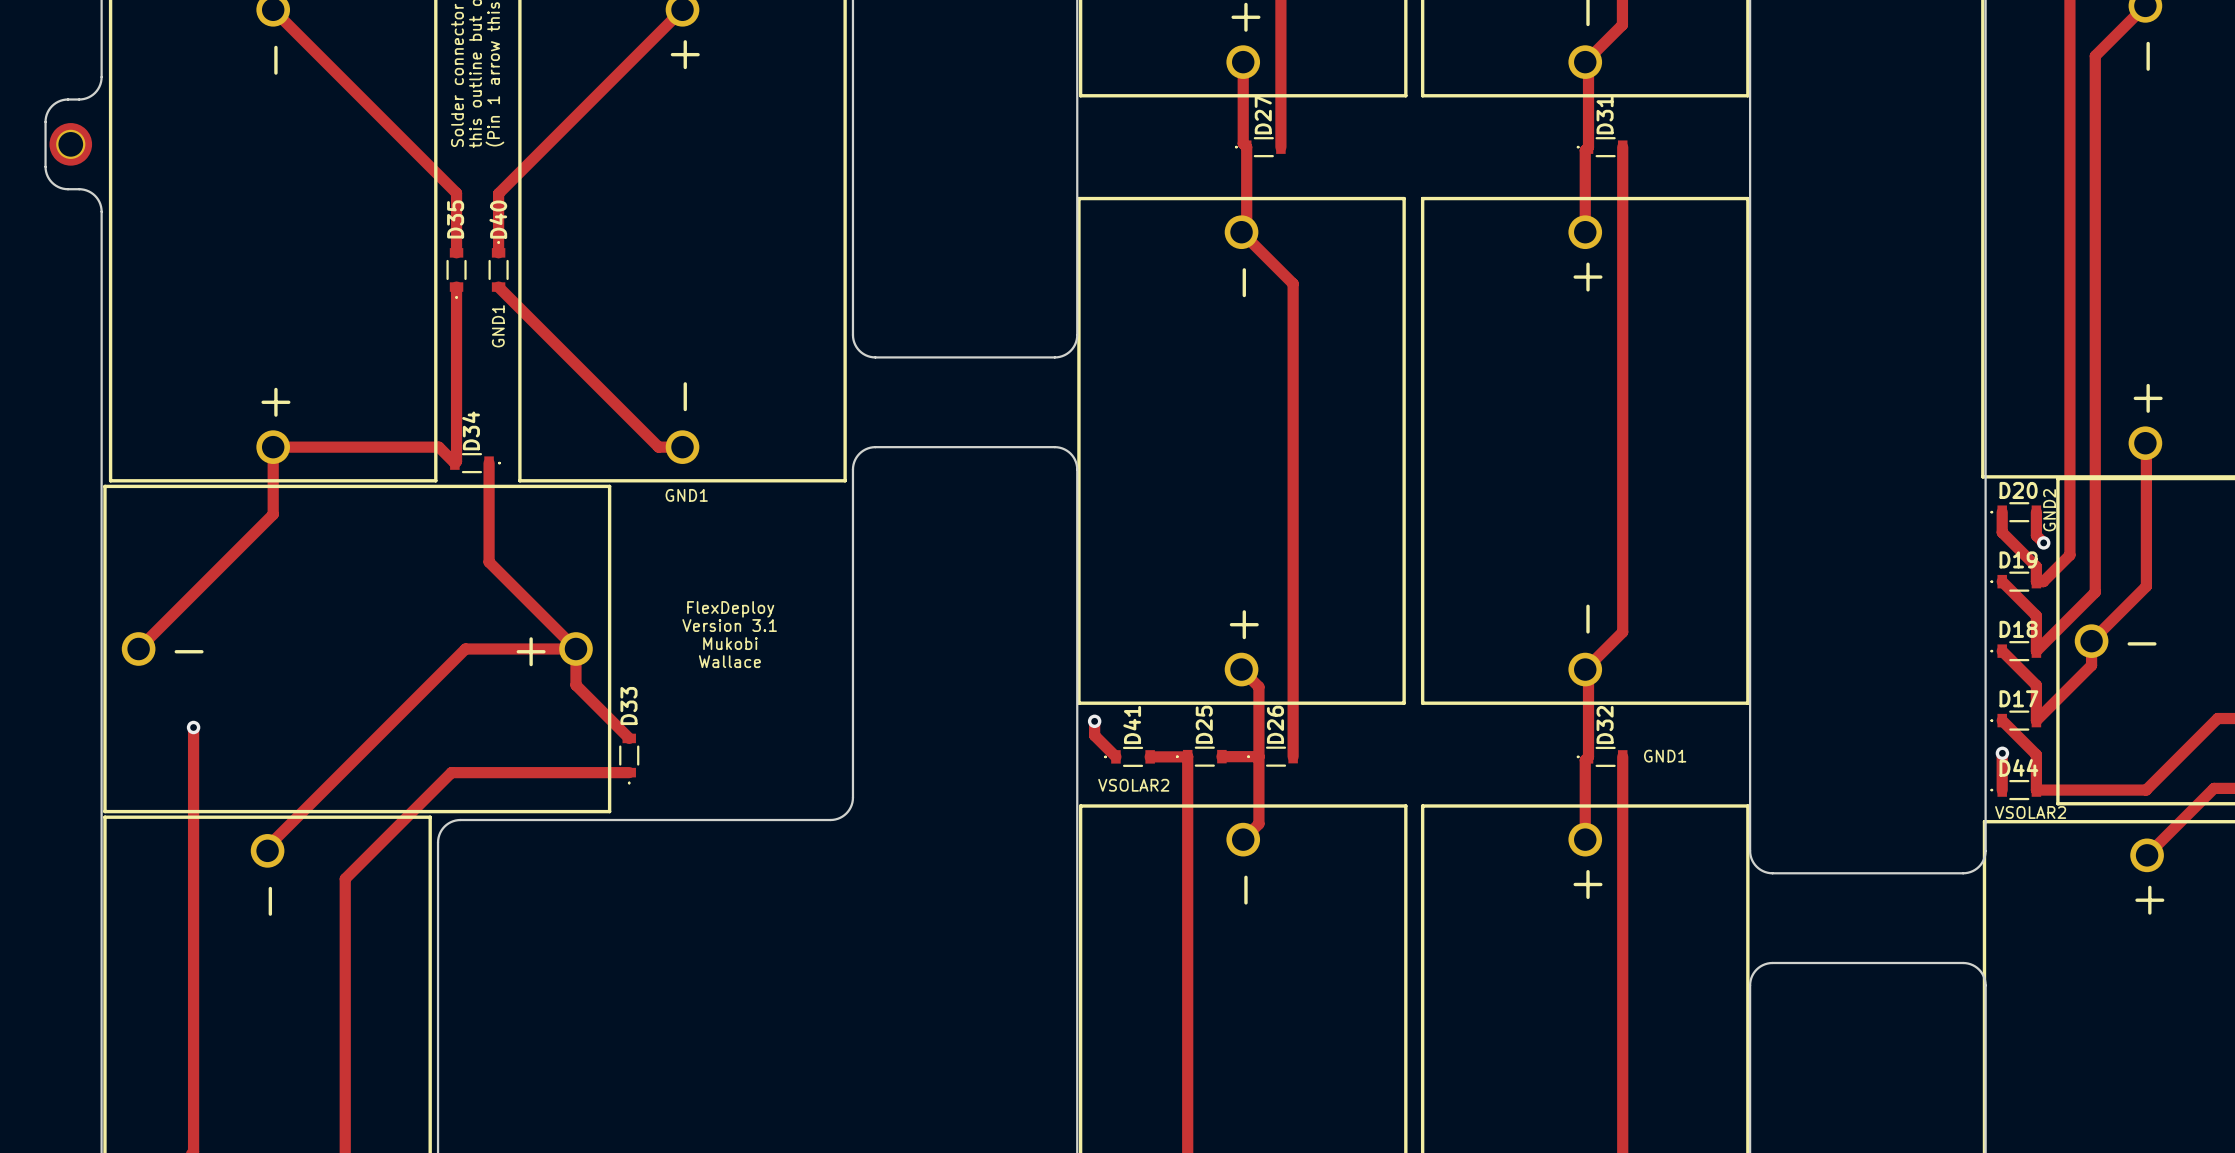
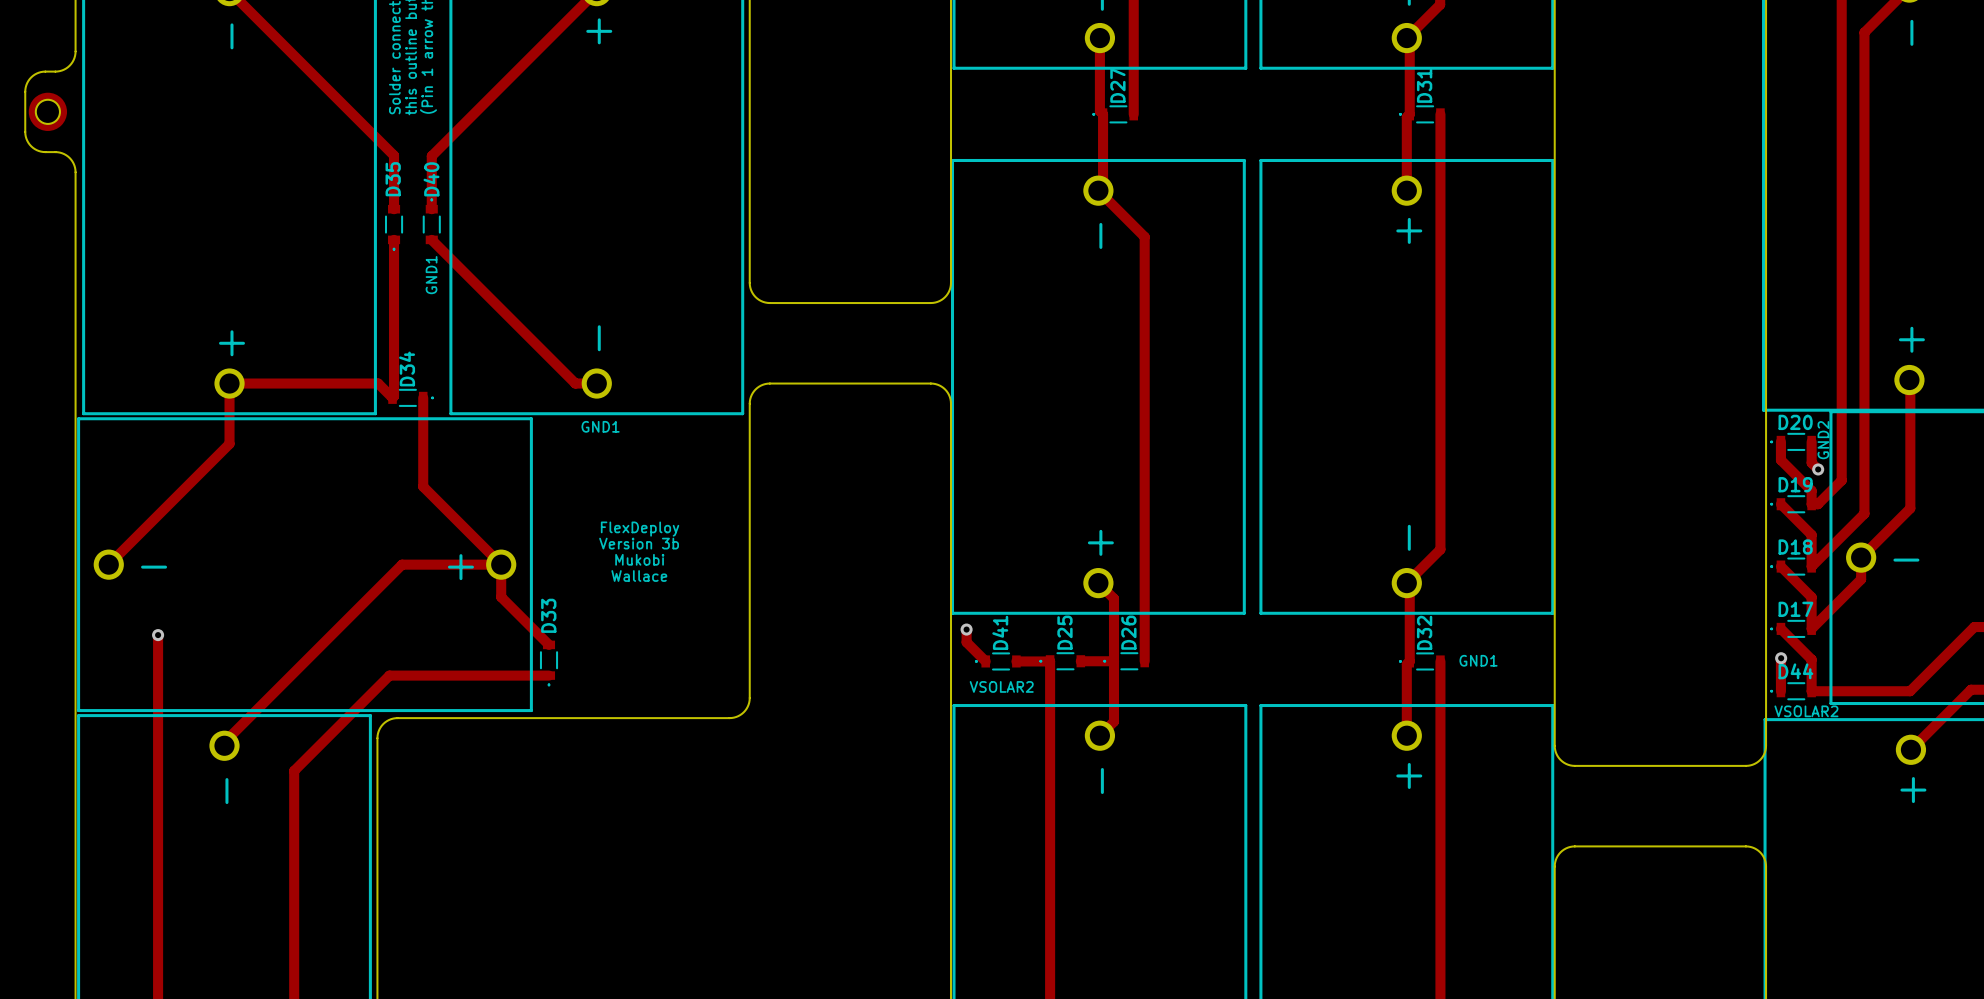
text: Version 3.1 (729, 625) -> Version 3b (639, 543)

